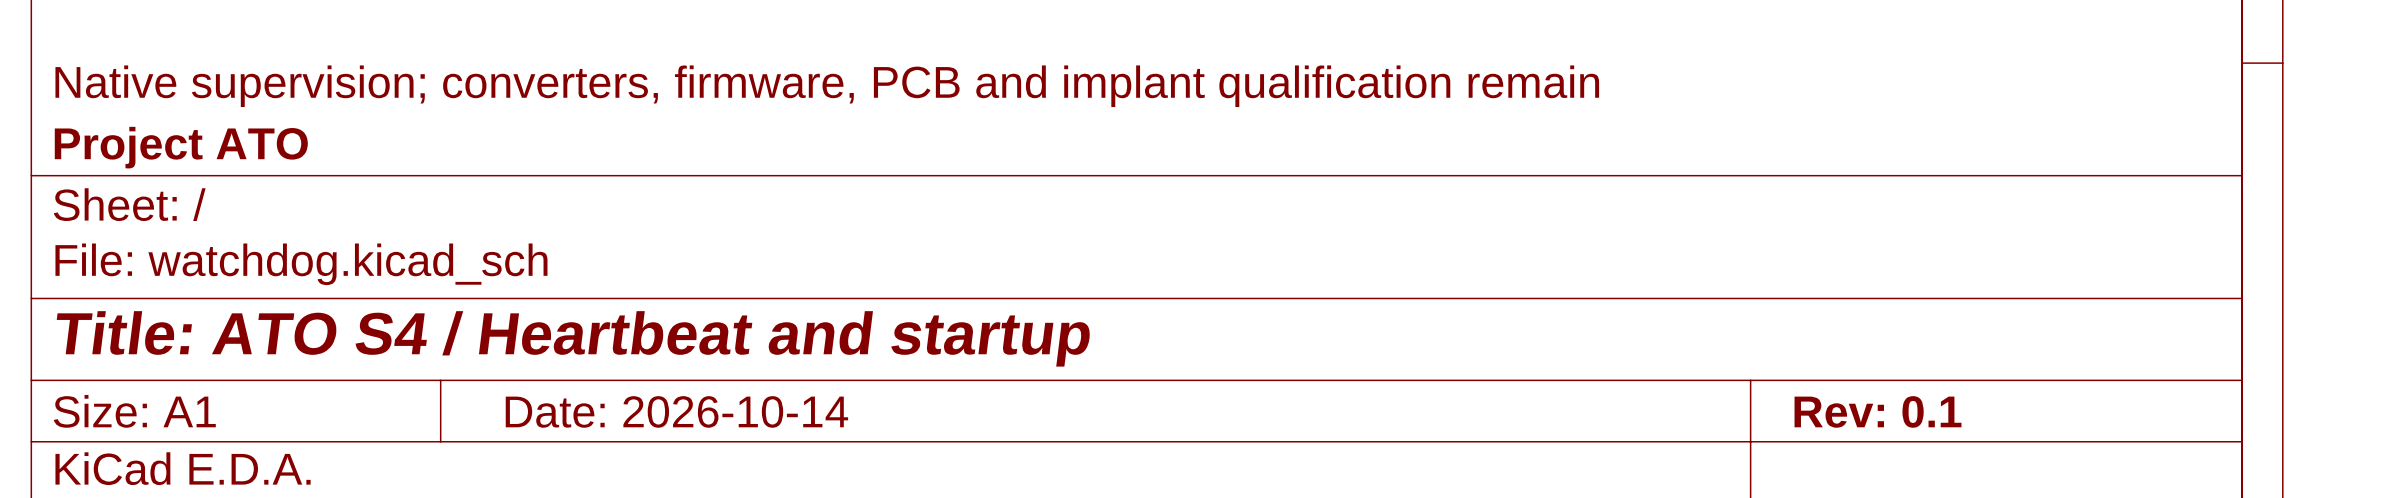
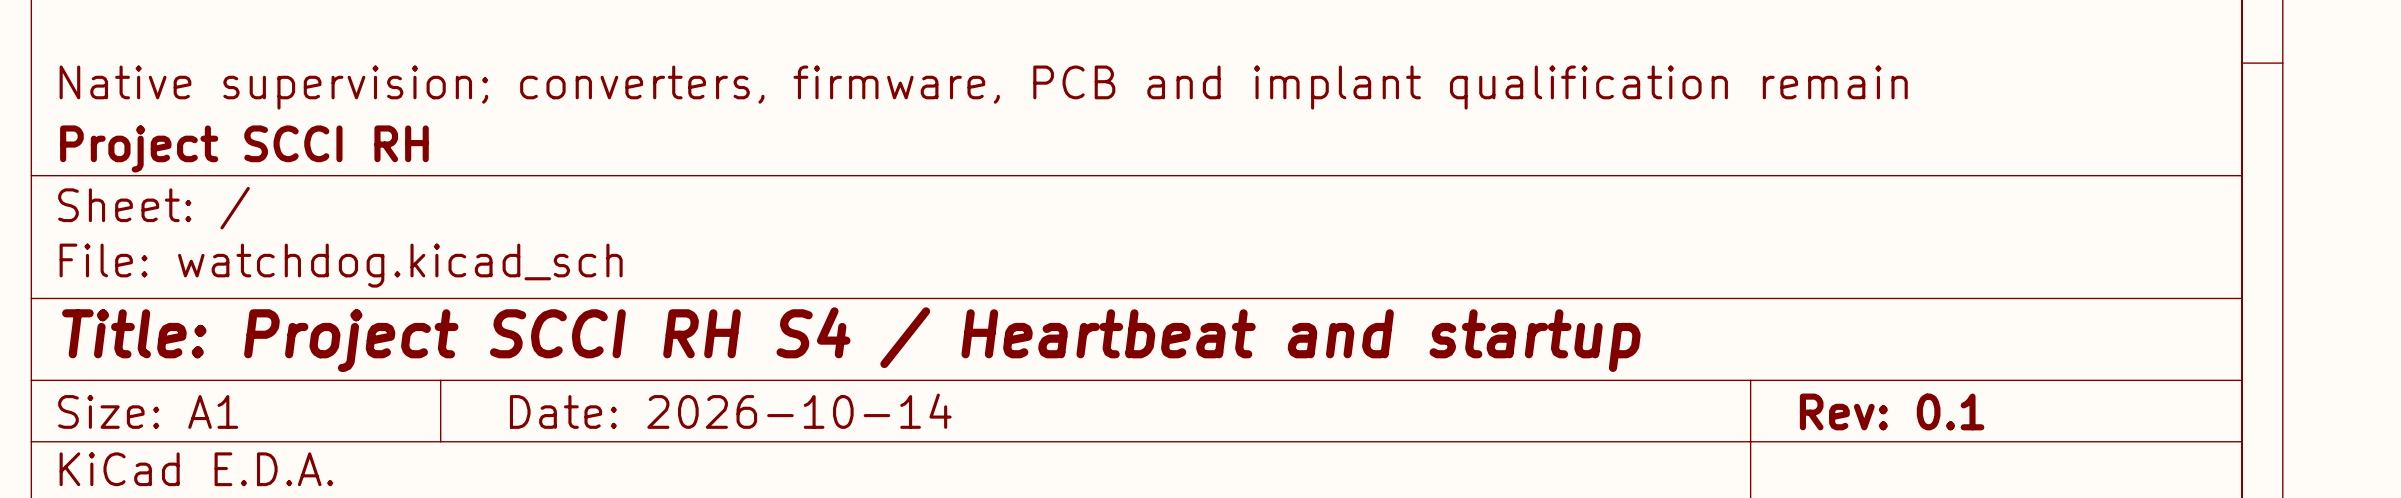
title block: Project ATO (181, 147) -> Project SCCI RH (244, 148)
title block: Title: ATO S4 / Heartbeat and startup (573, 338) -> Title: Project SCCI RH S4 / Heartbeat and startup (851, 339)

